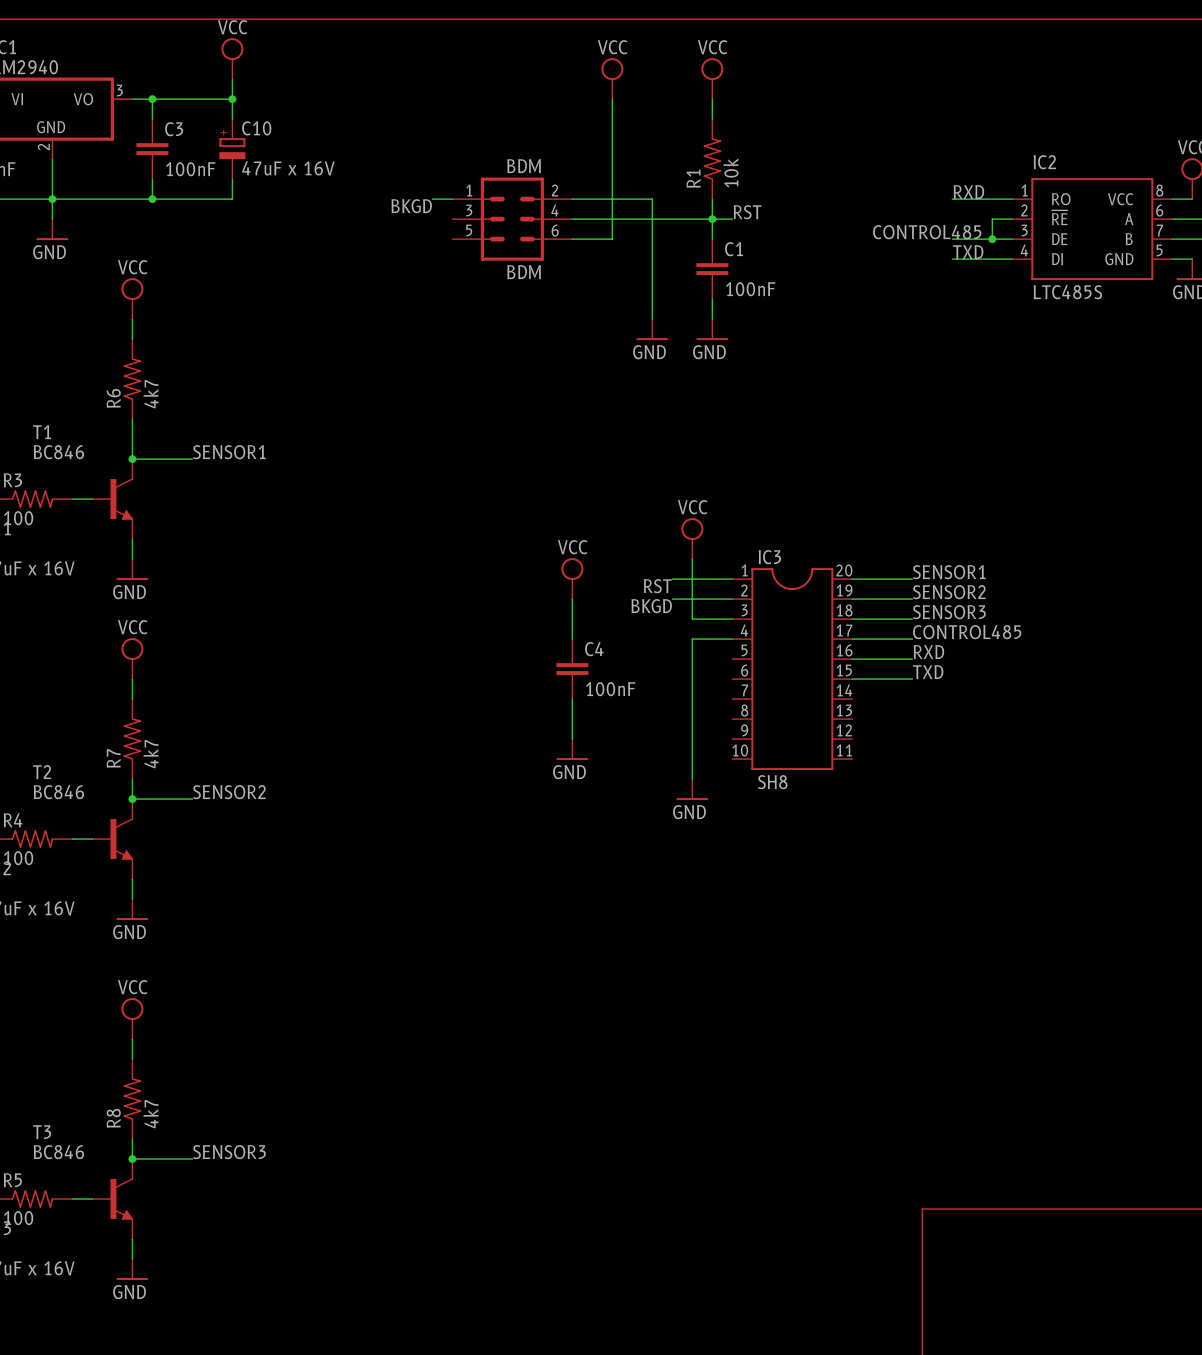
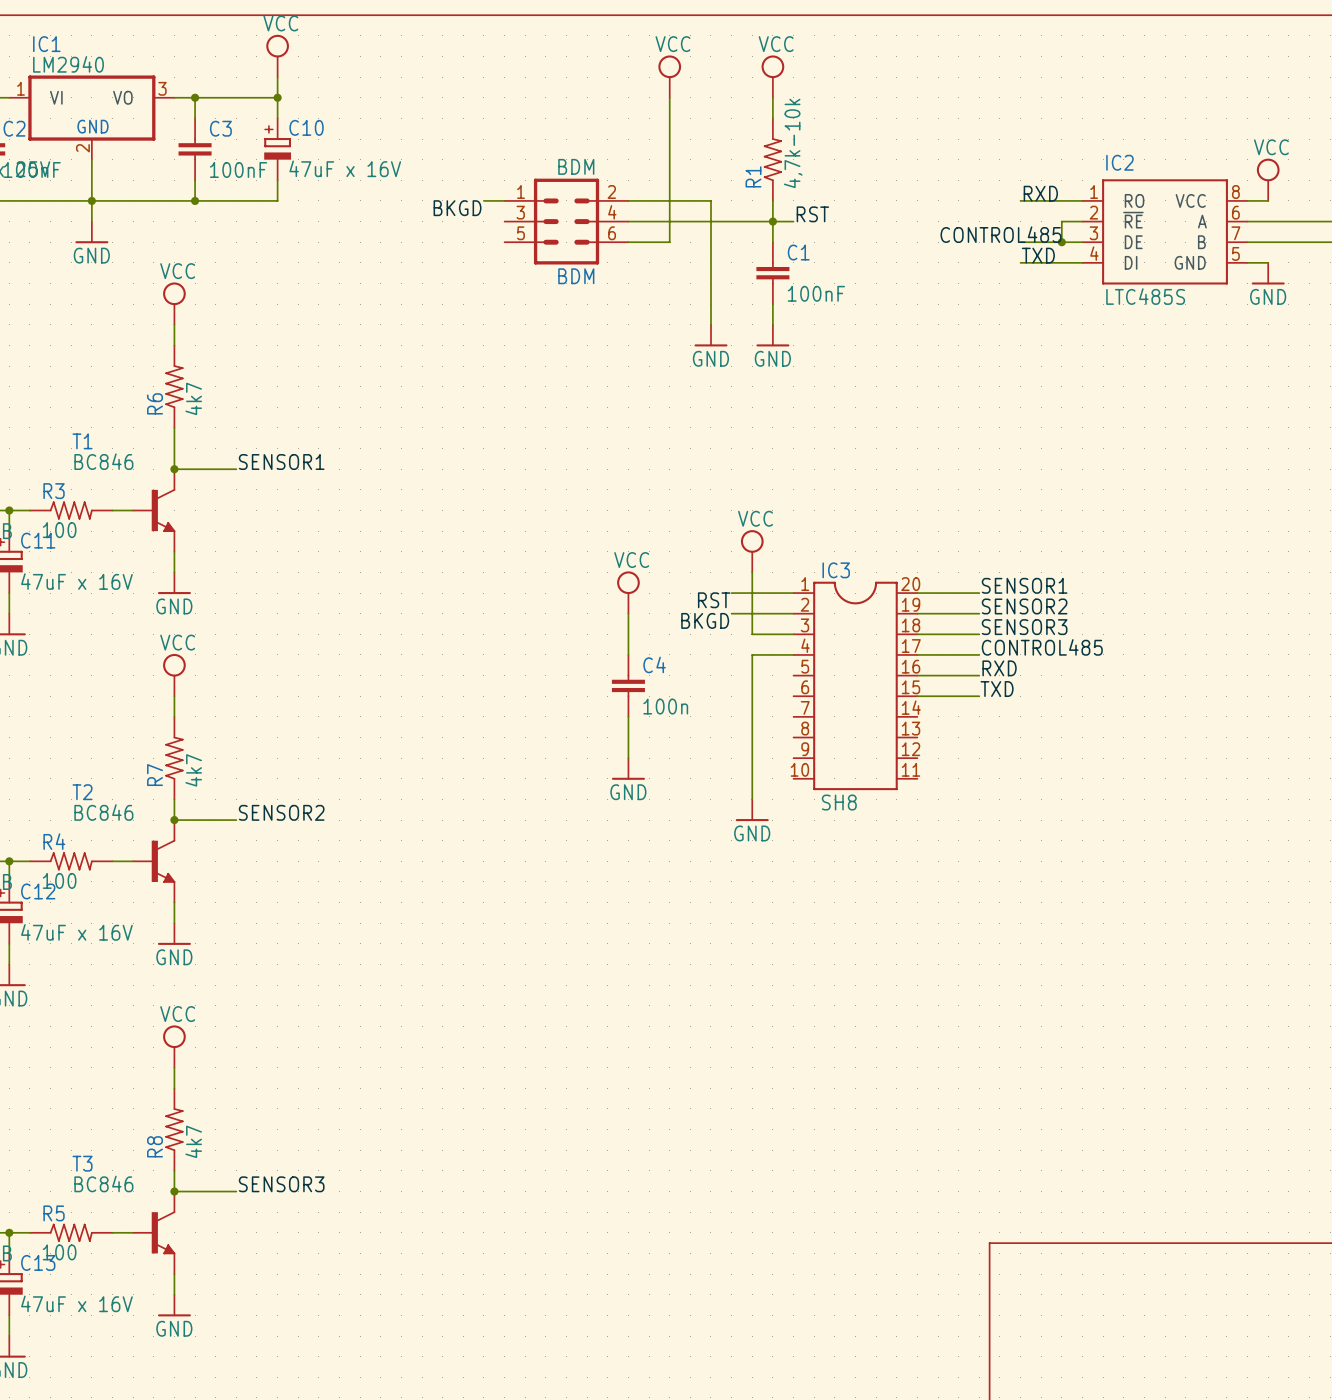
R1 value: 10k (730, 172) -> 4,7k-10k (793, 143)
C4 value: 100nF (610, 689) -> 100n (665, 706)

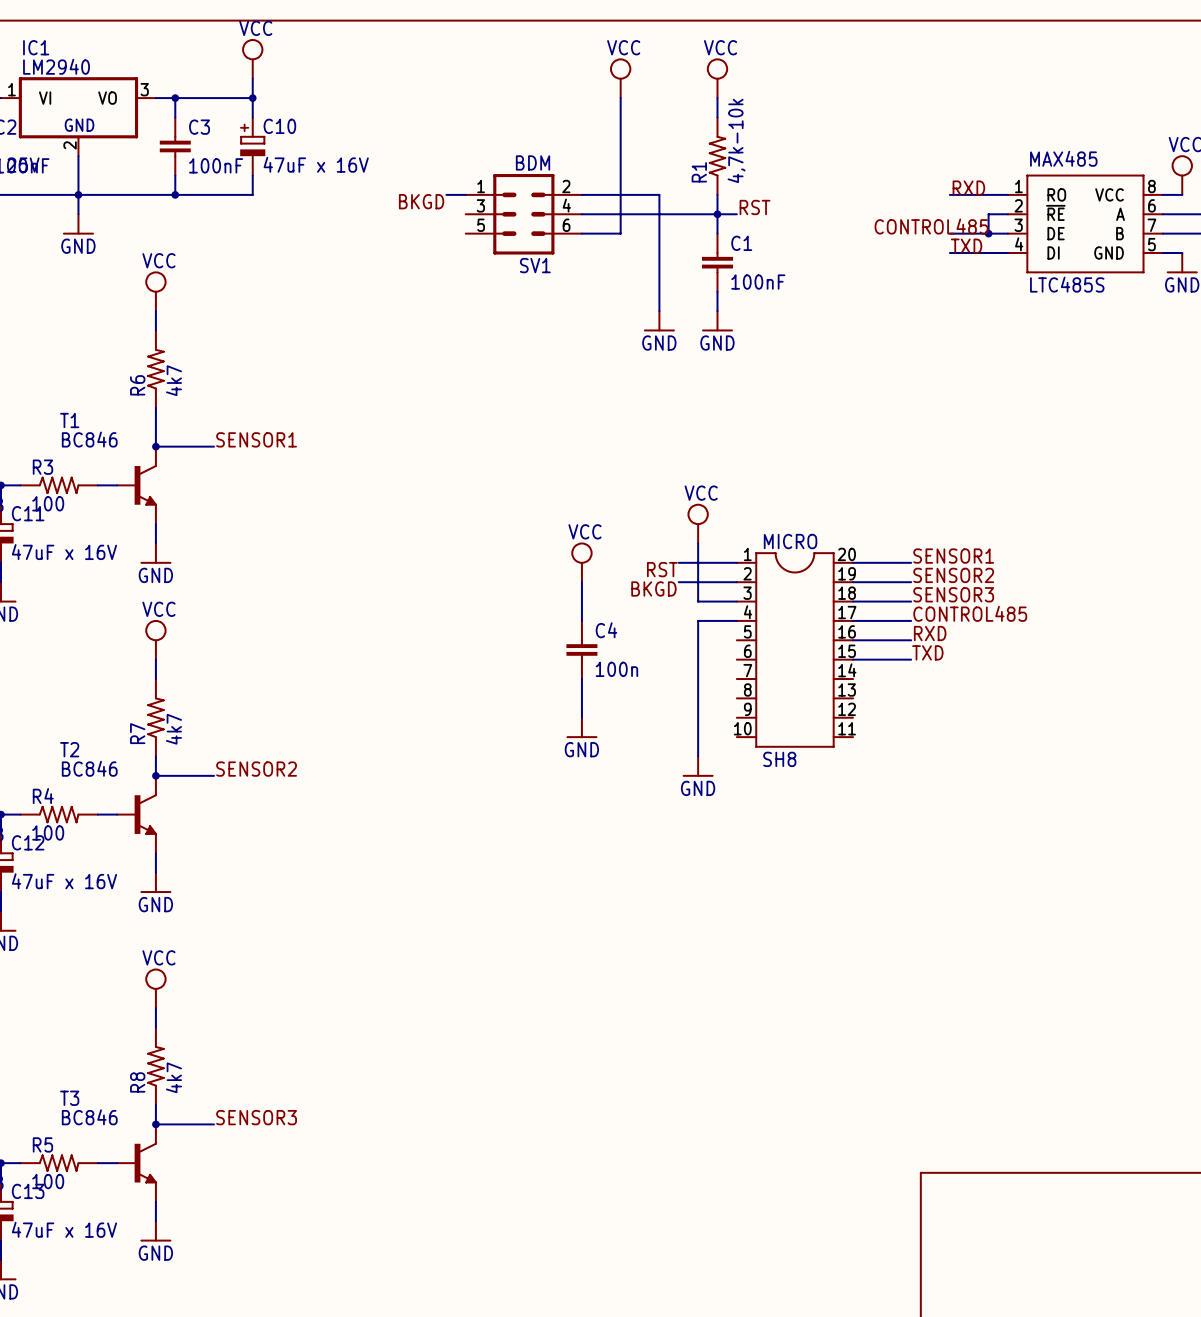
IC2 name: IC2 (1119, 162) -> MAX485 (1063, 158)
BDM name: BDM (576, 276) -> SV1 (535, 265)
IC3 name: IC3 (836, 570) -> MICRO (790, 541)

